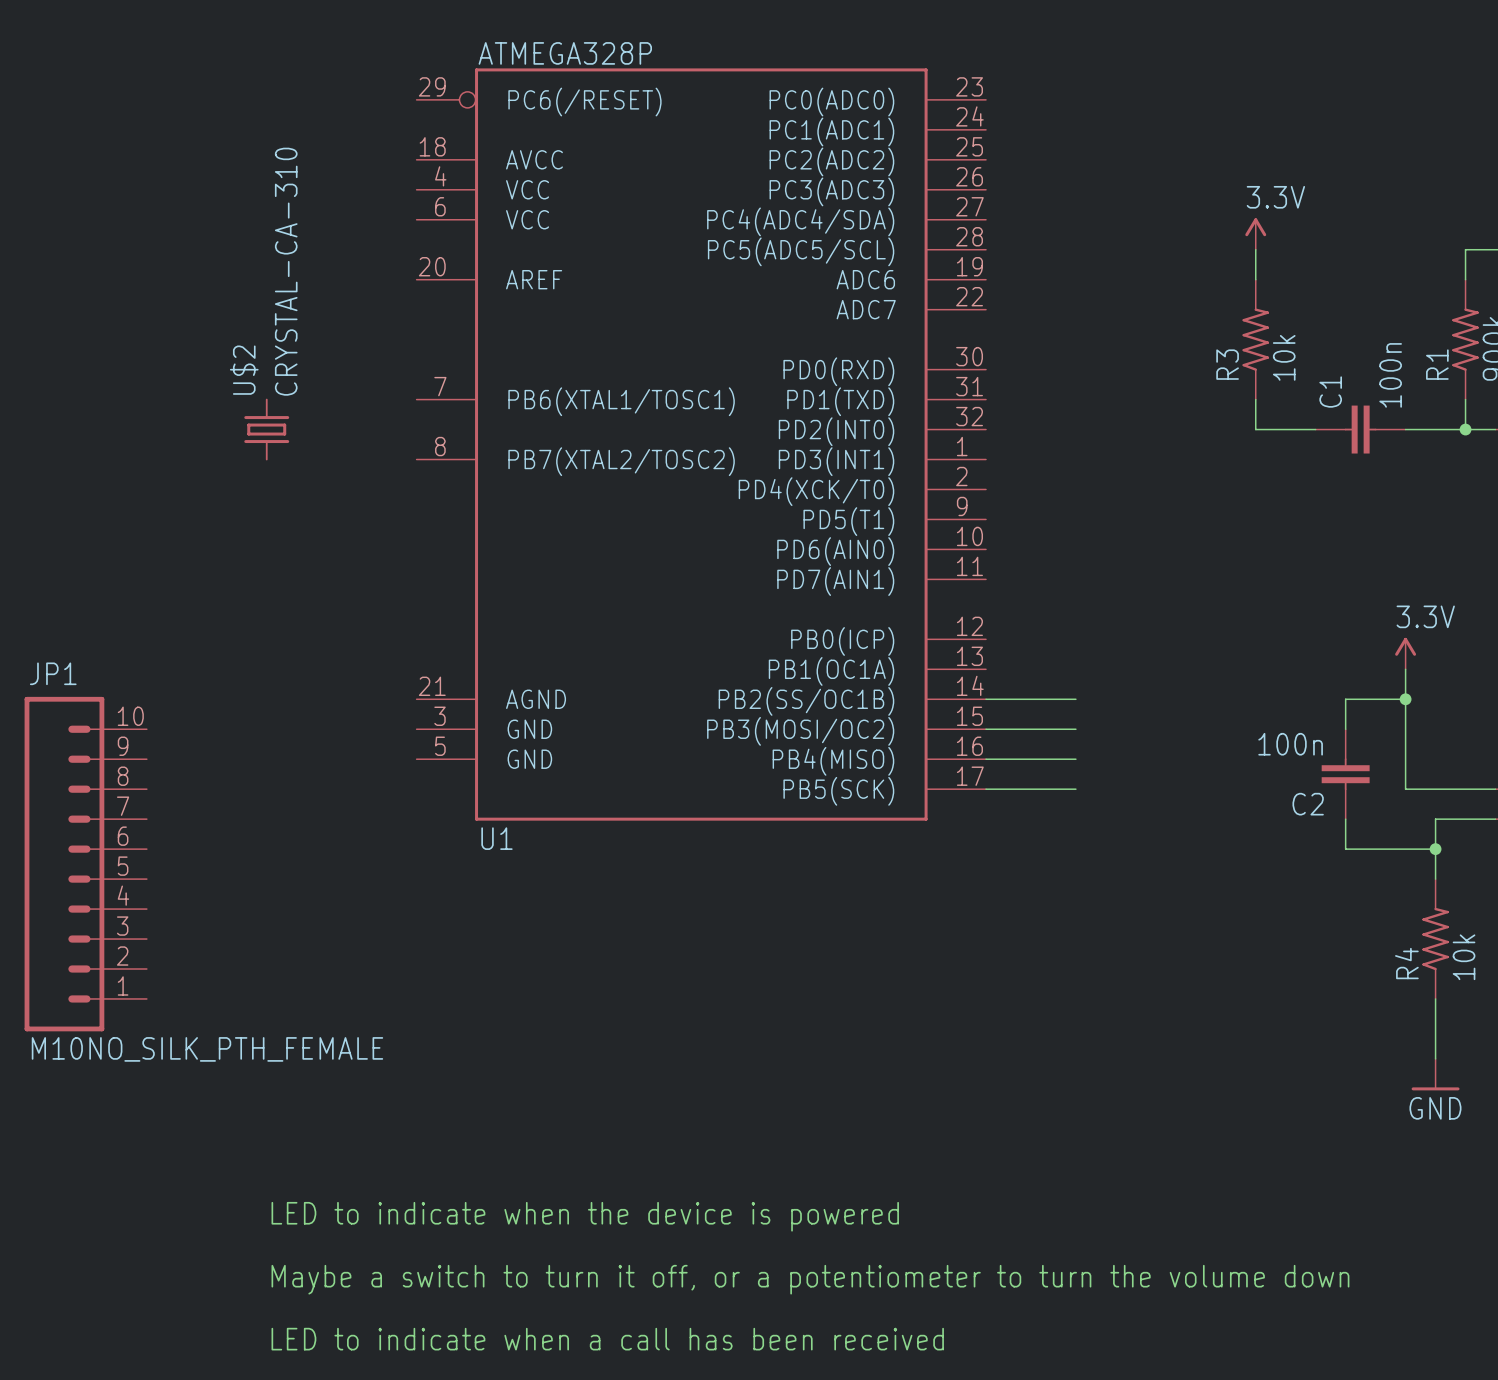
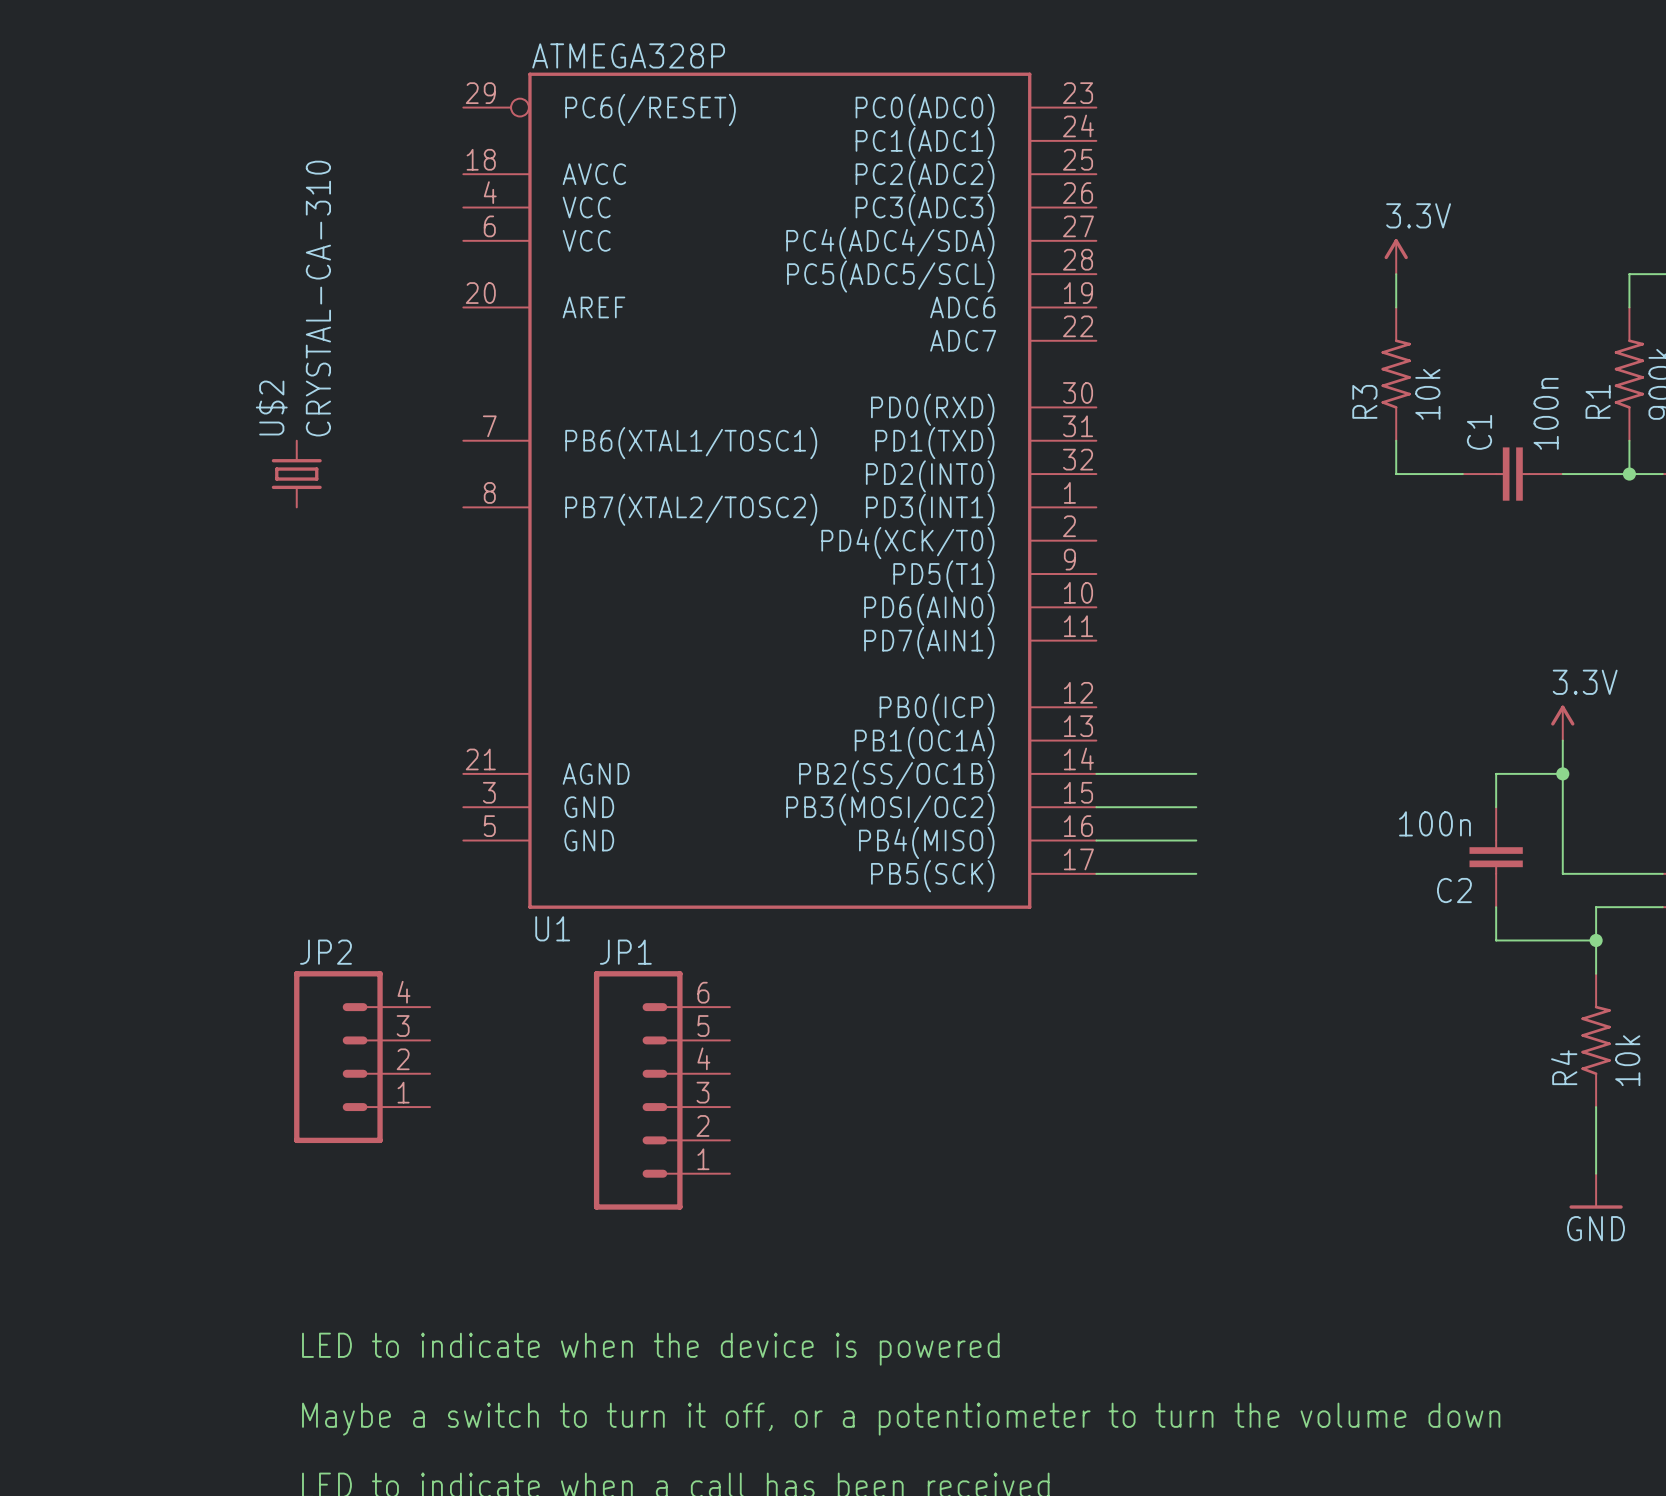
JP1 name position: JP1 (53, 673) -> JP1 (625, 952)
JP1 symbol: [24, 696, 147, 1032] -> [593, 971, 730, 1210]
JP2: none -> (362, 1057)
JP1 value: M10NO_SILK_PTH_FEMALE (207, 1049) -> none

